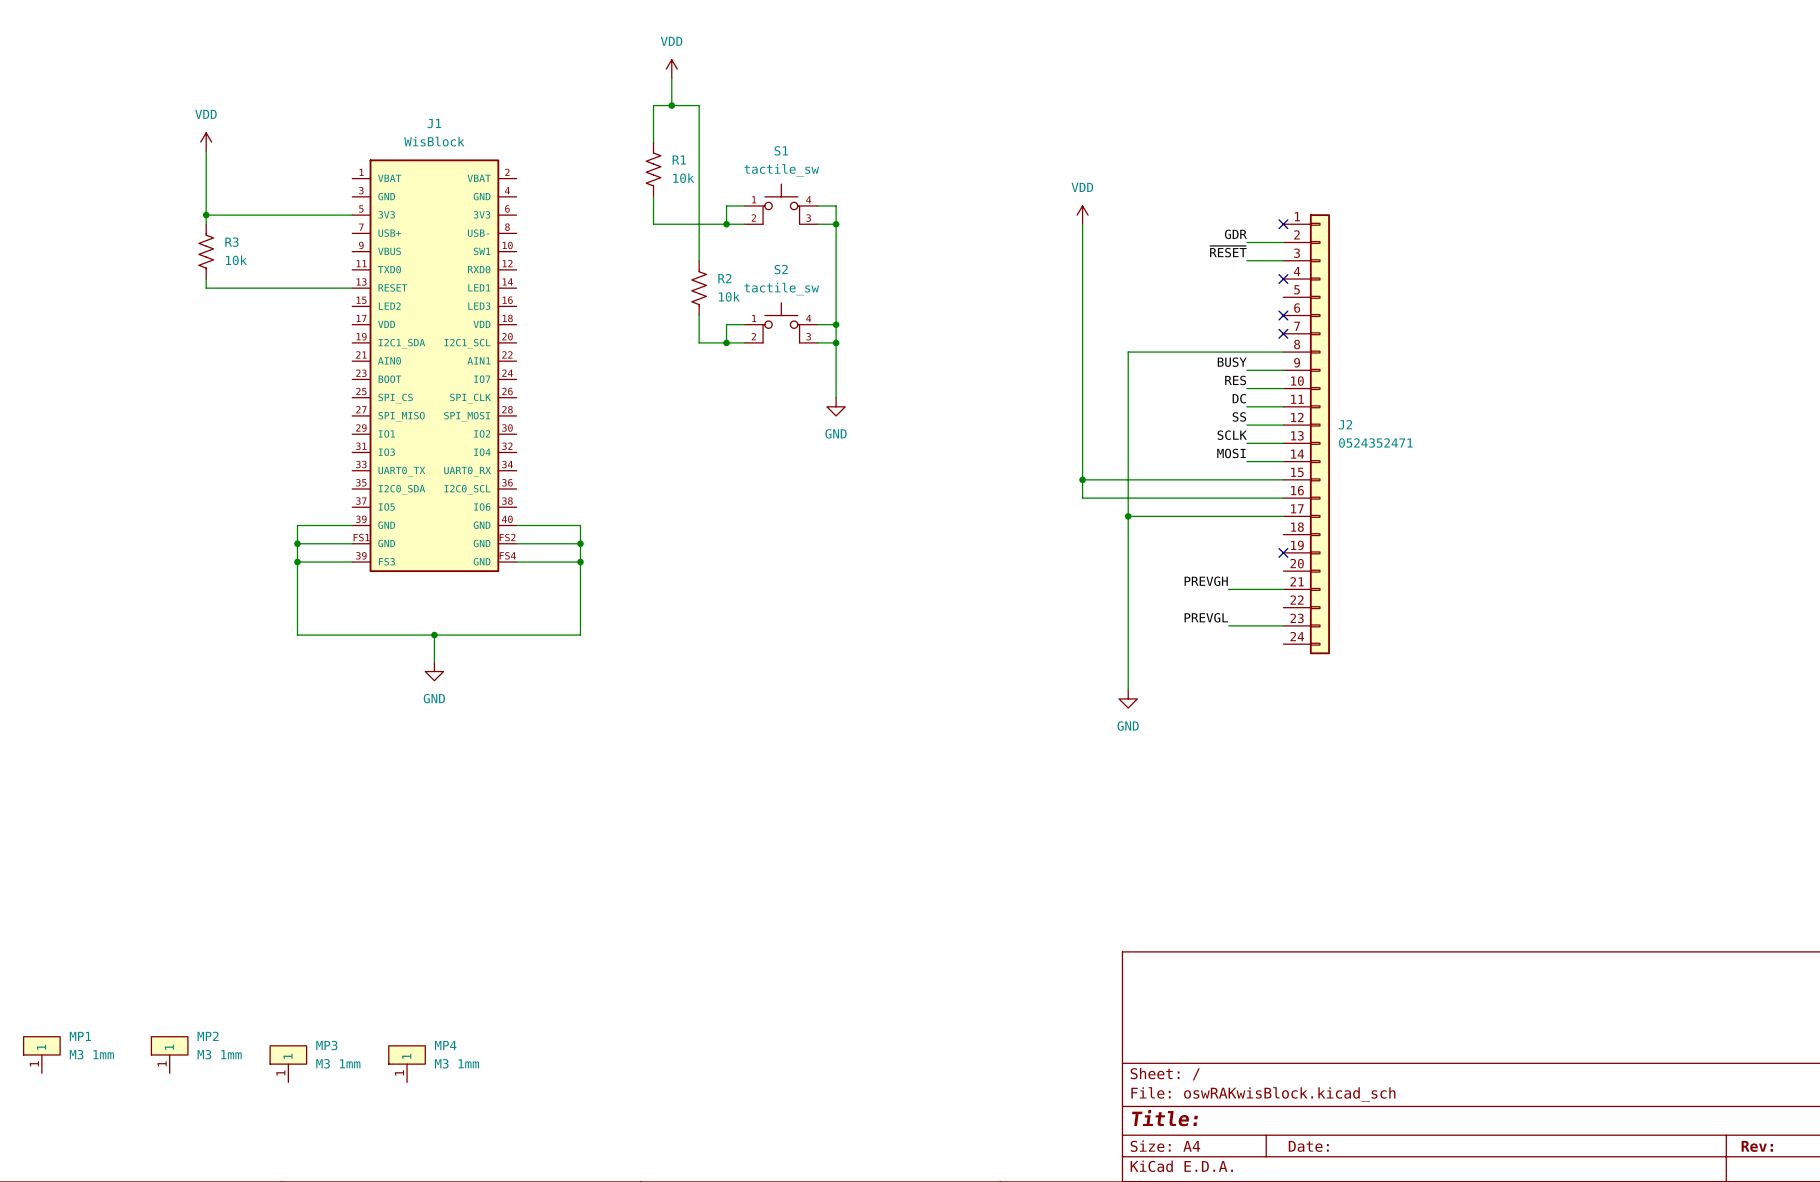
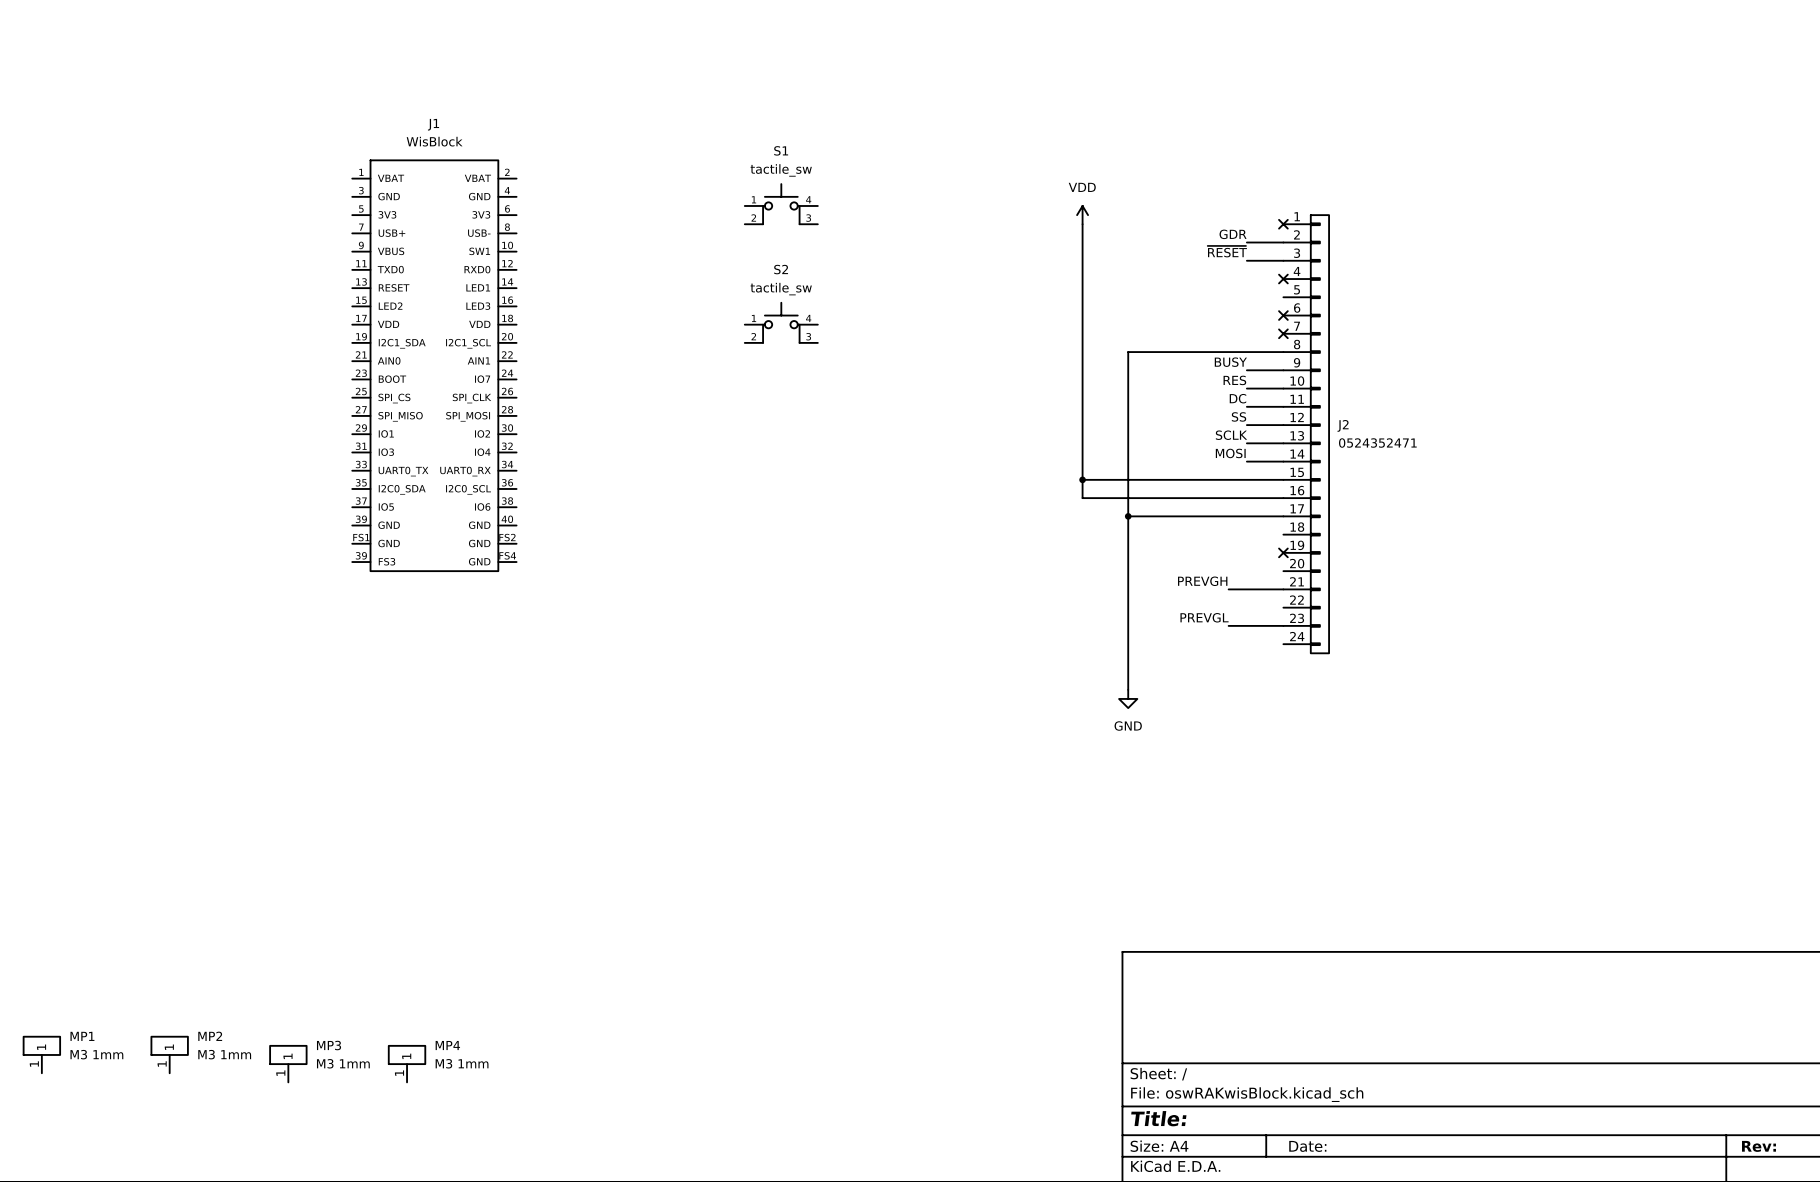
power symbol: VDD (671, 69) -> none
wire: (671, 78) (671, 105) -> none
junction: (671, 105) -> none
power symbol: VDD (206, 142) -> none
wire: (653, 142) (653, 105) (699, 105) (699, 260) -> none
wire: (206, 151) (206, 224) -> none
R1: 10k (653, 169) -> none
wire: (653, 196) (653, 224) (744, 224) -> none
wire: (744, 205) (726, 205) (726, 224) -> none
wire: (817, 205) (836, 205) (836, 397) -> none
wire: (206, 215) (352, 215) -> none
junction: (206, 215) -> none
junction: (726, 224) -> none
wire: (817, 224) (836, 224) -> none
junction: (836, 224) -> none
R3: 10k (206, 251) -> none
wire: (206, 279) (206, 288) (352, 288) -> none
R2: 10k (699, 288) -> none
wire: (699, 315) (699, 342) (744, 342) -> none
wire: (744, 324) (726, 324) (726, 342) -> none
wire: (817, 324) (836, 324) -> none
junction: (836, 324) -> none
junction: (726, 342) -> none
wire: (817, 342) (836, 342) -> none
junction: (836, 342) -> none
power symbol: GND (836, 406) -> none
wire: (352, 525) (297, 525) (297, 635) (580, 635) (580, 525) (516, 525) -> none
wire: (297, 543) (352, 543) -> none
junction: (297, 543) -> none
wire: (516, 543) (580, 543) -> none
junction: (580, 543) -> none
wire: (297, 562) (352, 562) -> none
junction: (297, 562) -> none
wire: (516, 562) (580, 562) -> none
junction: (580, 562) -> none
wire: (434, 635) (434, 662) -> none
junction: (434, 635) -> none
power symbol: GND (434, 671) -> none

